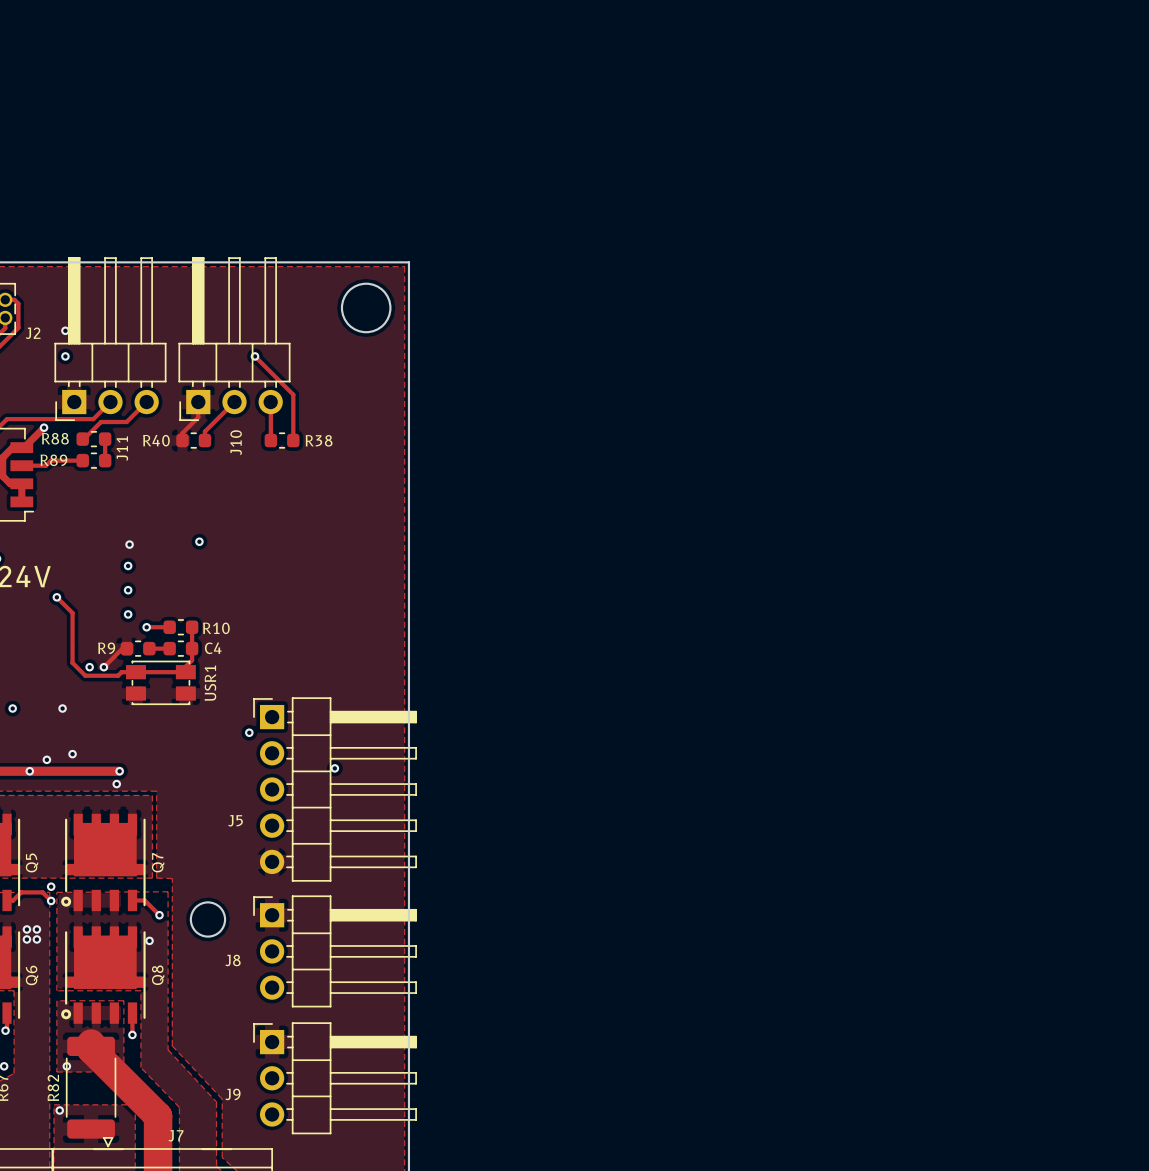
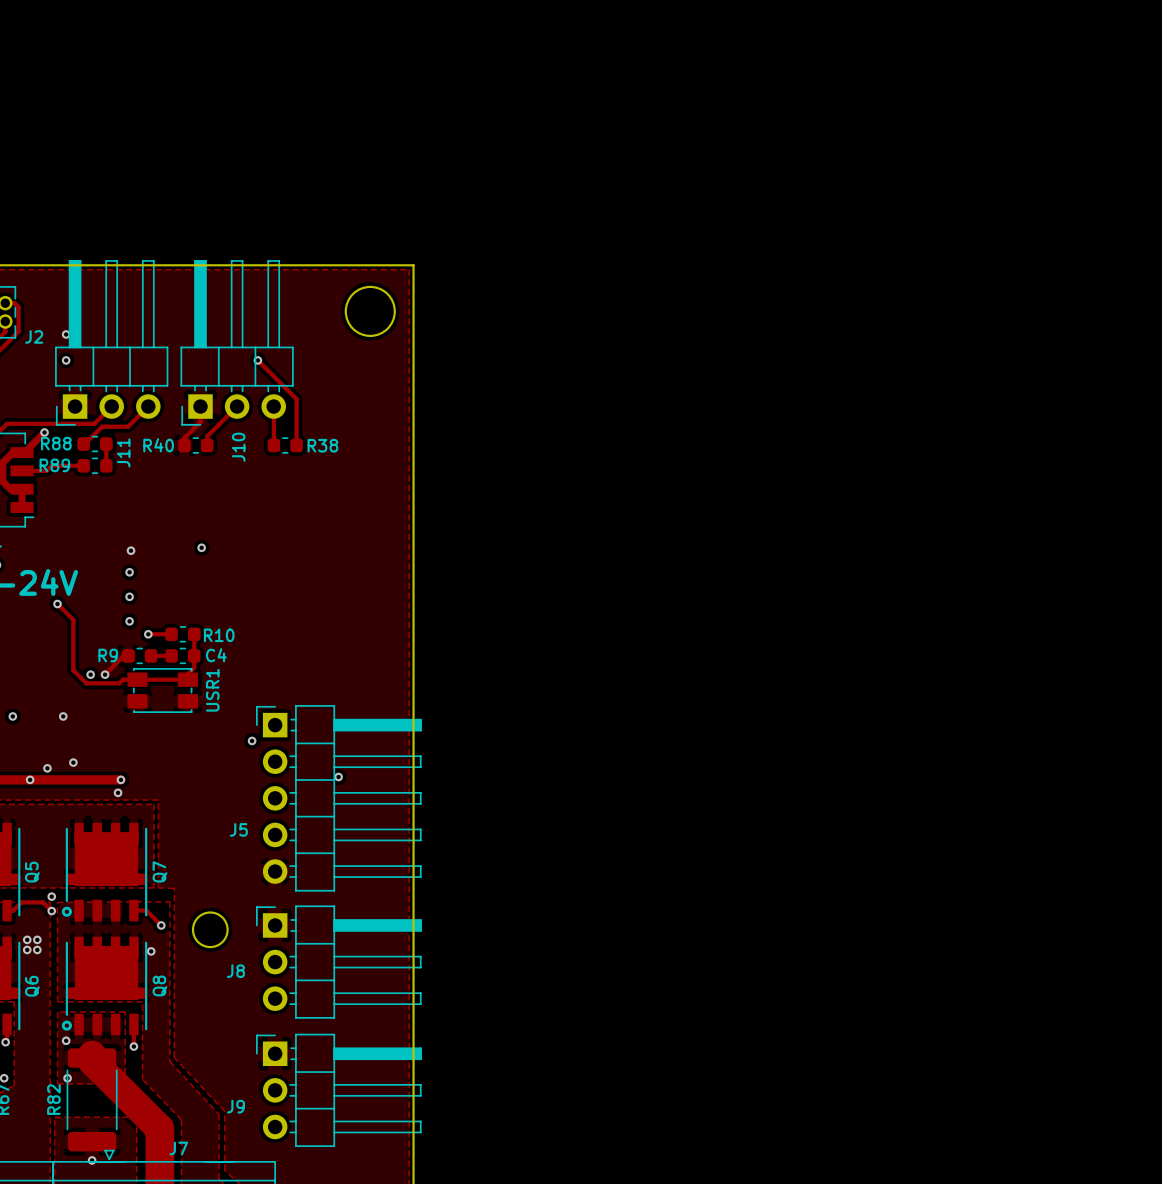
via: none -> (66, 1040)
via: (59, 1110) -> none
via: none -> (92, 1160)

